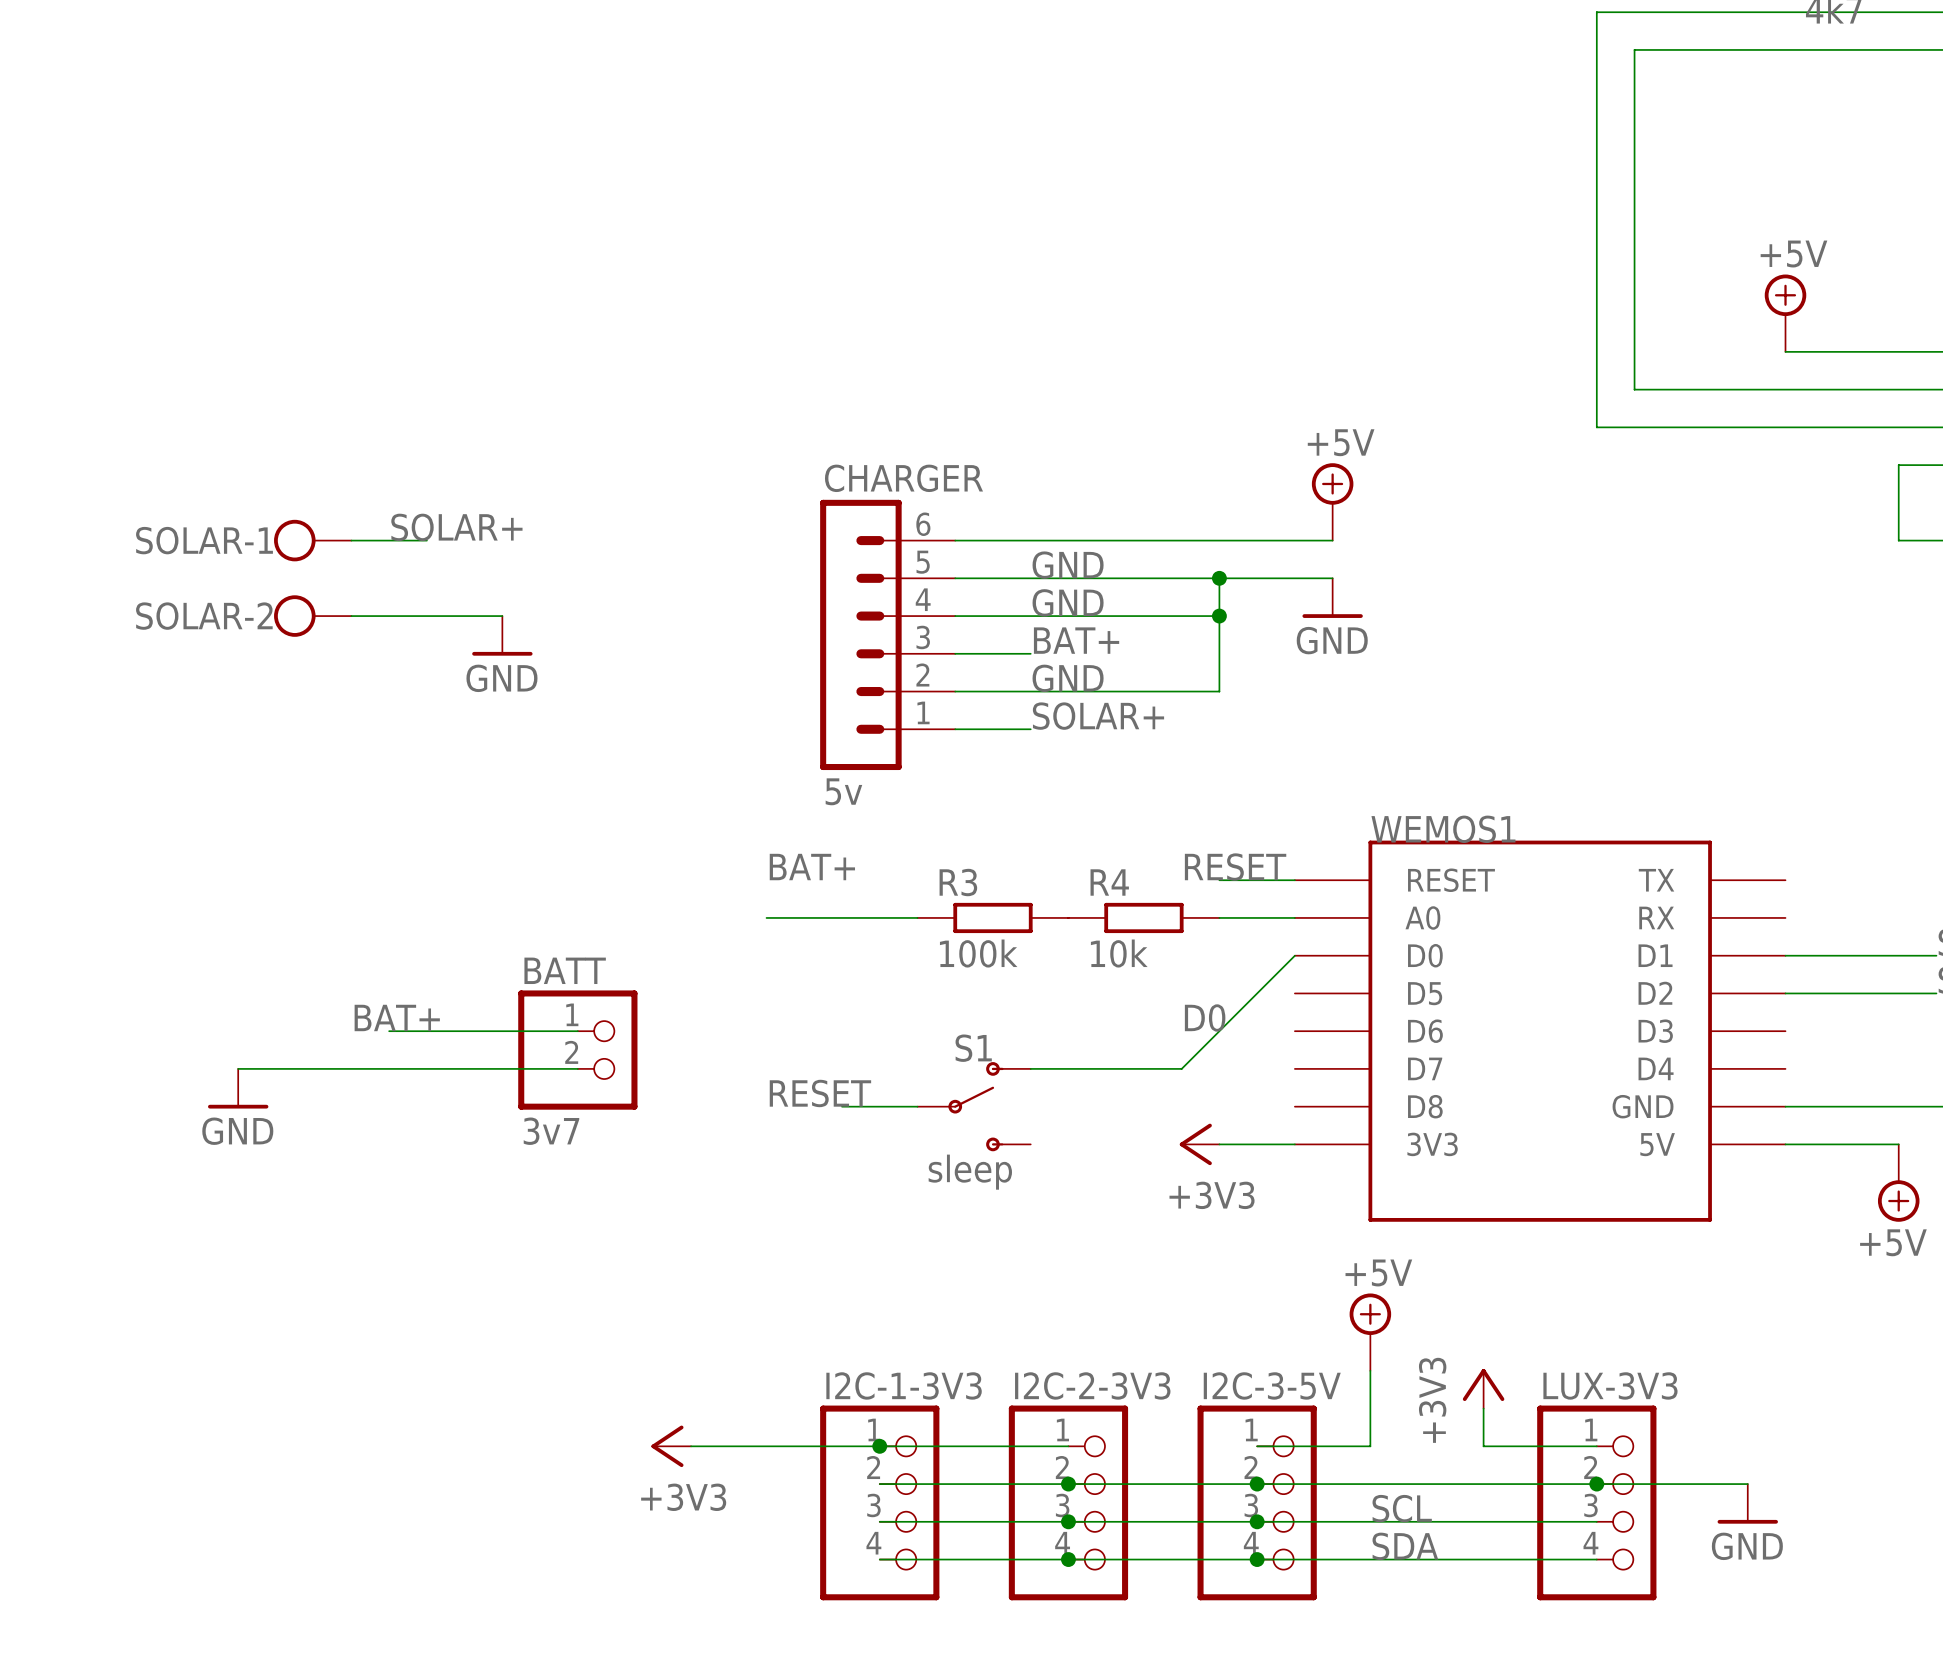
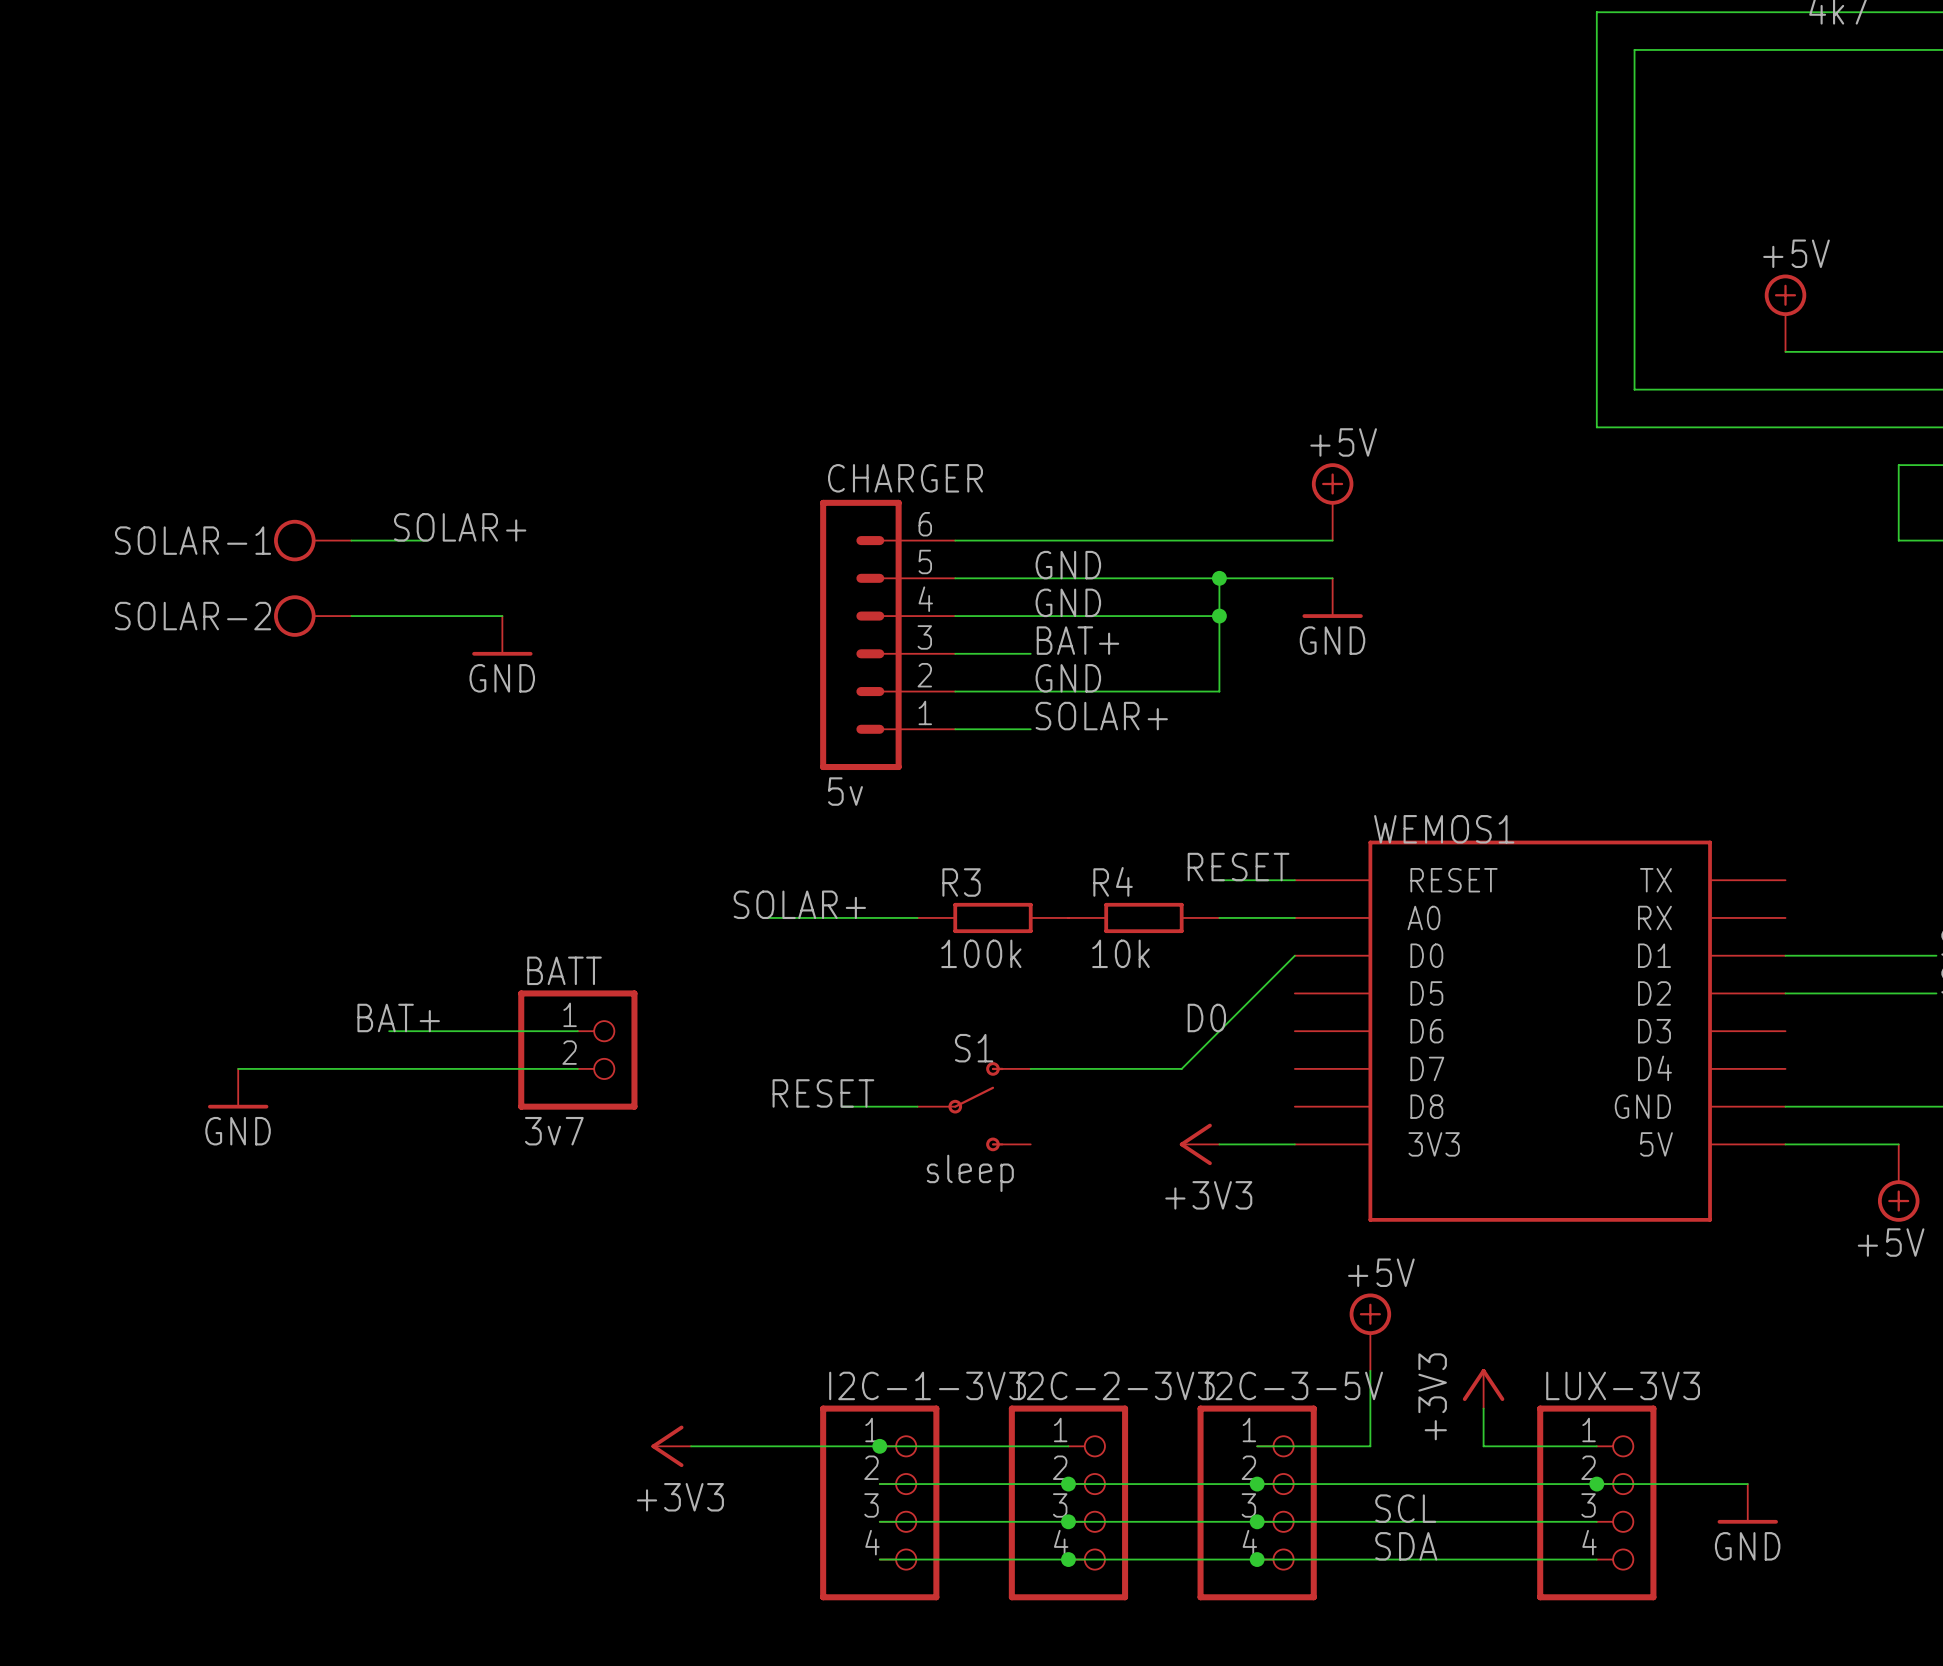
label: BAT+ (812, 867) -> none
label: none -> SOLAR+ (799, 904)

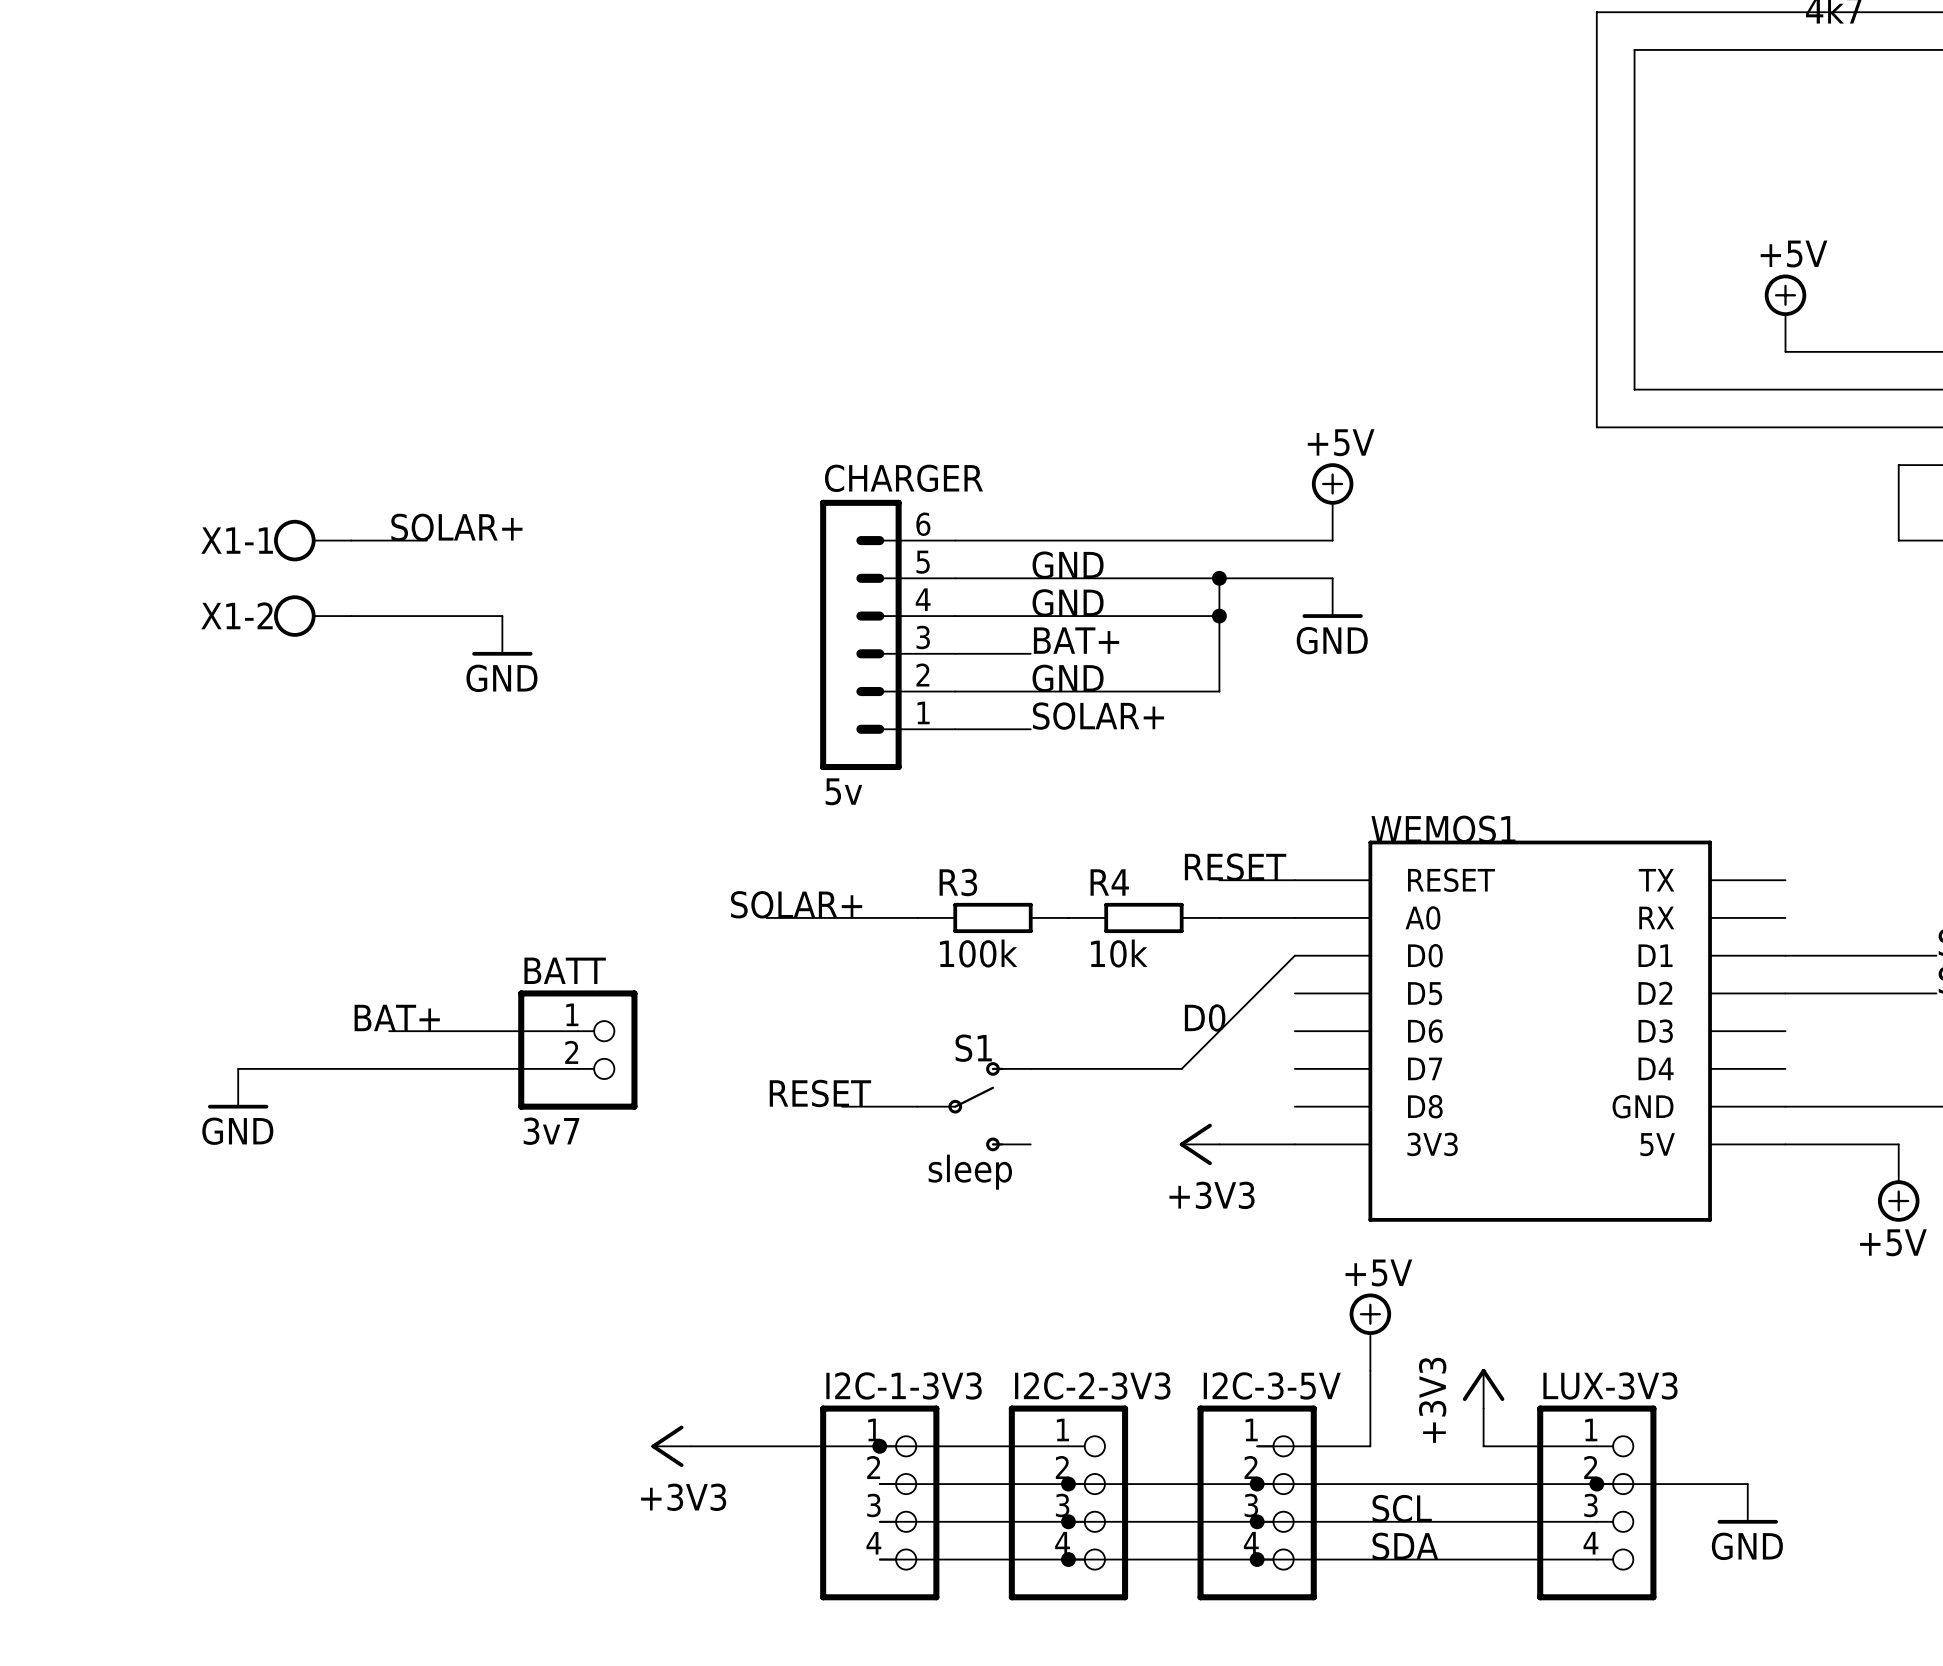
SOLAR-1 name: SOLAR-1 (193, 540) -> X1-1 (237, 540)
SOLAR-2 name: SOLAR-2 (193, 616) -> X1-2 (236, 615)

